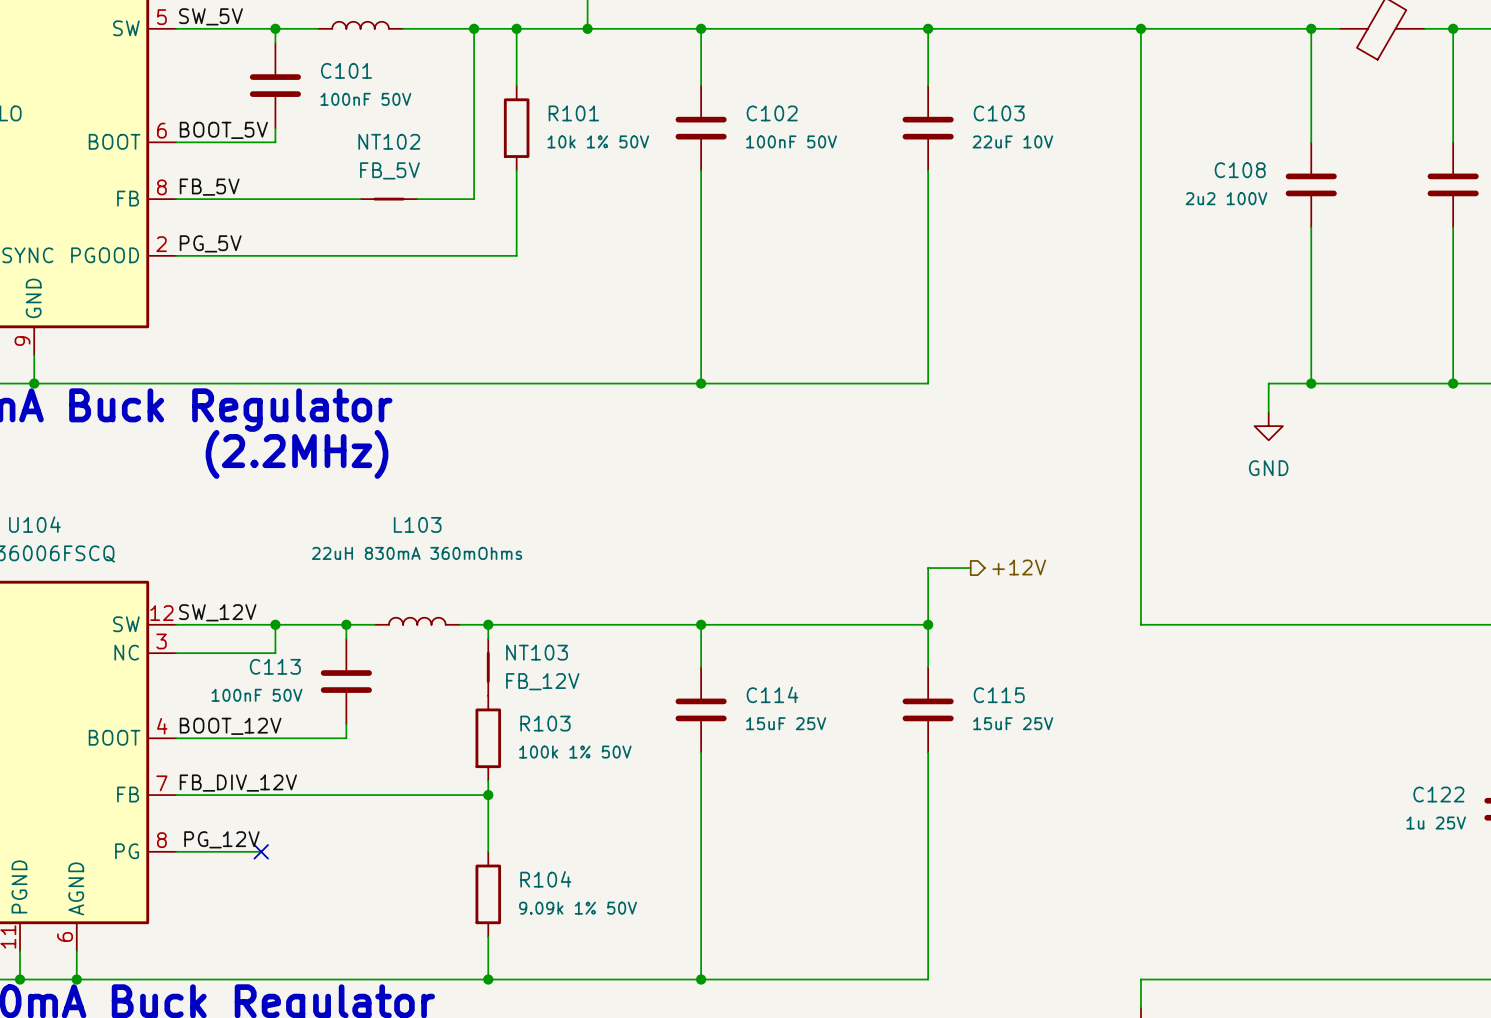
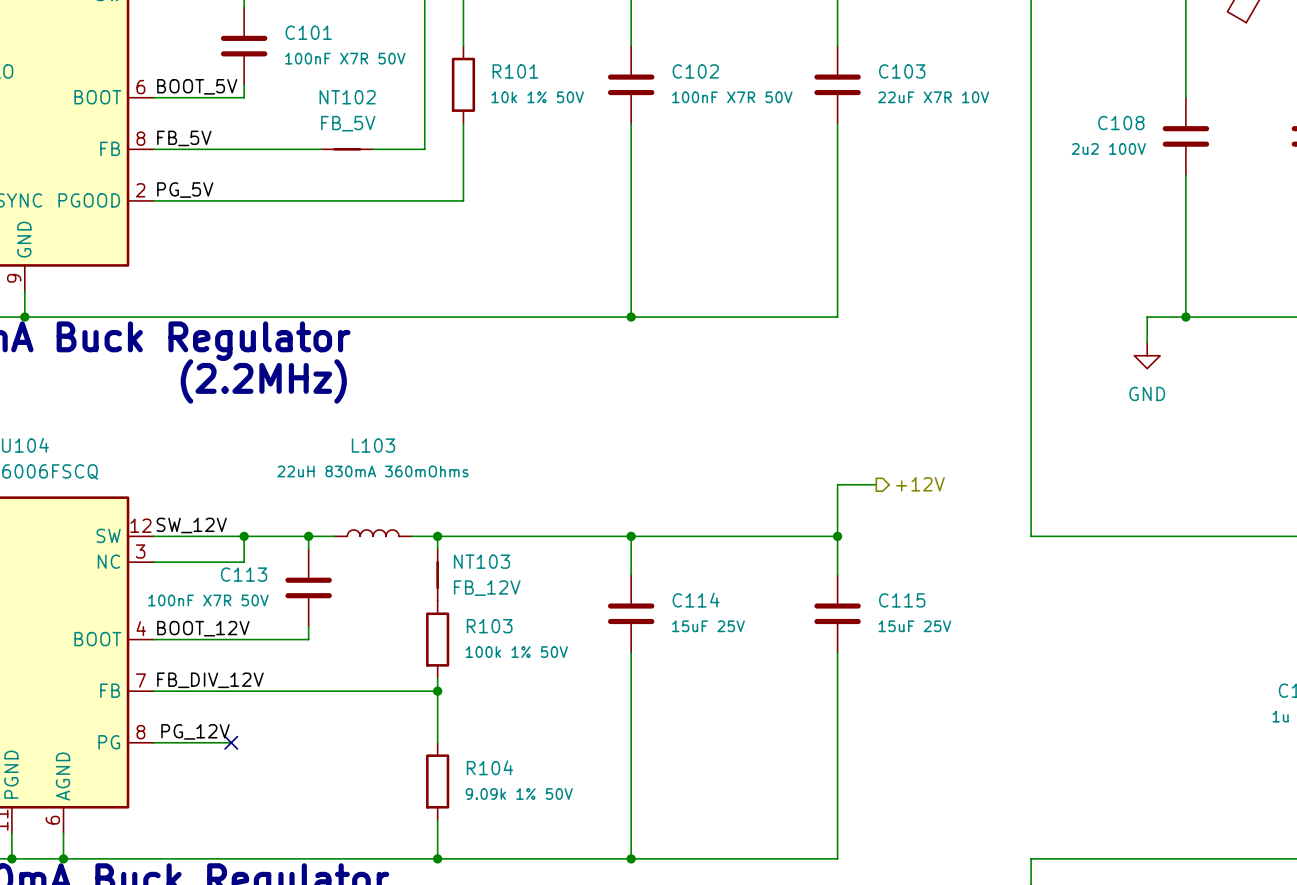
C101 value: 100nF 50V (365, 99) -> 100nF X7R 50V (345, 58)
C102 value: 100nF 50V (791, 141) -> 100nF X7R 50V (732, 97)
C103 value: 22uF 10V (1012, 141) -> 22uF X7R 10V (933, 97)
C113 value: 100nF 50V (257, 695) -> 100nF X7R 50V (208, 600)

